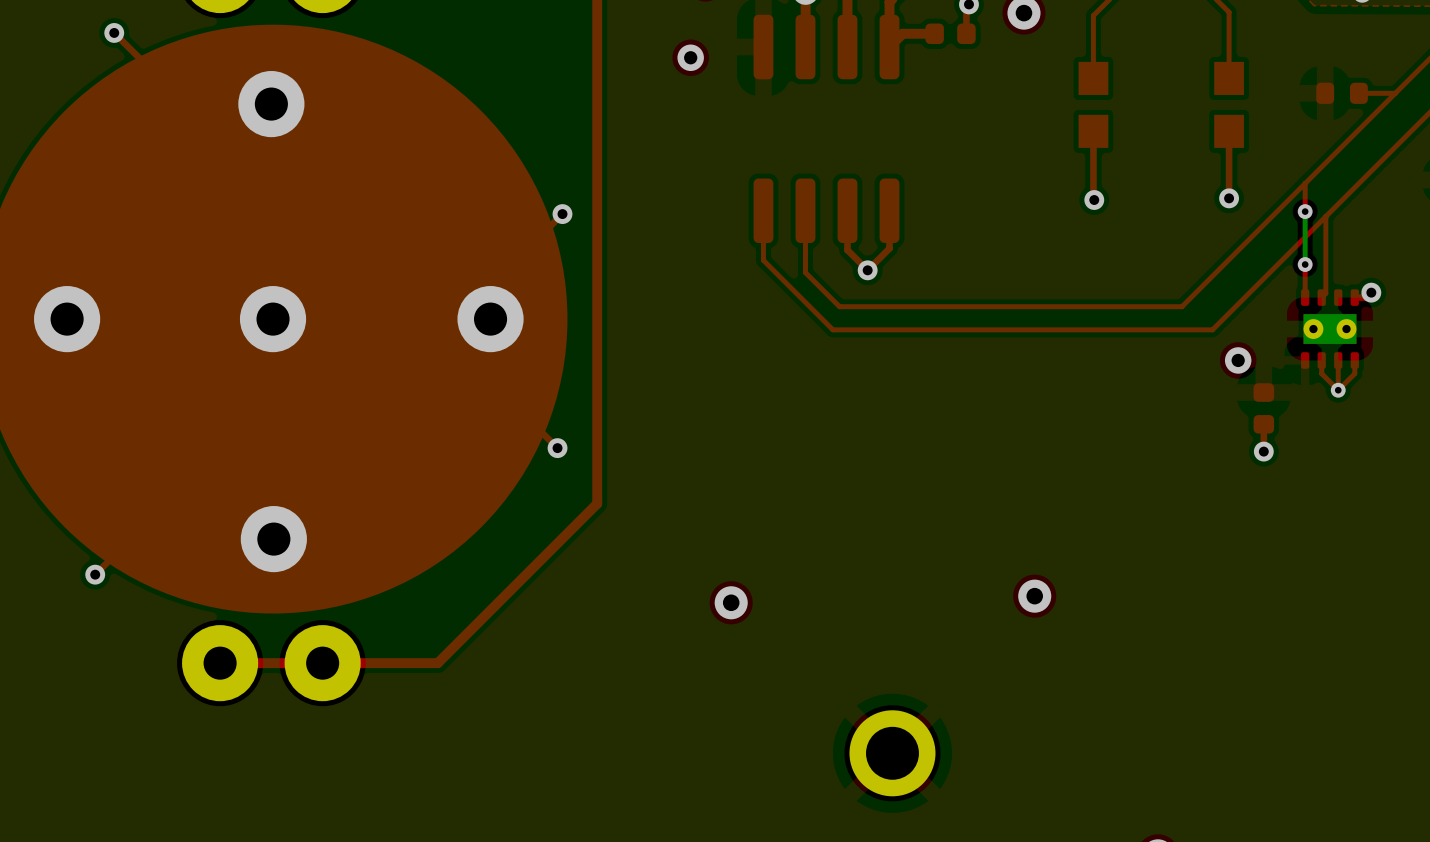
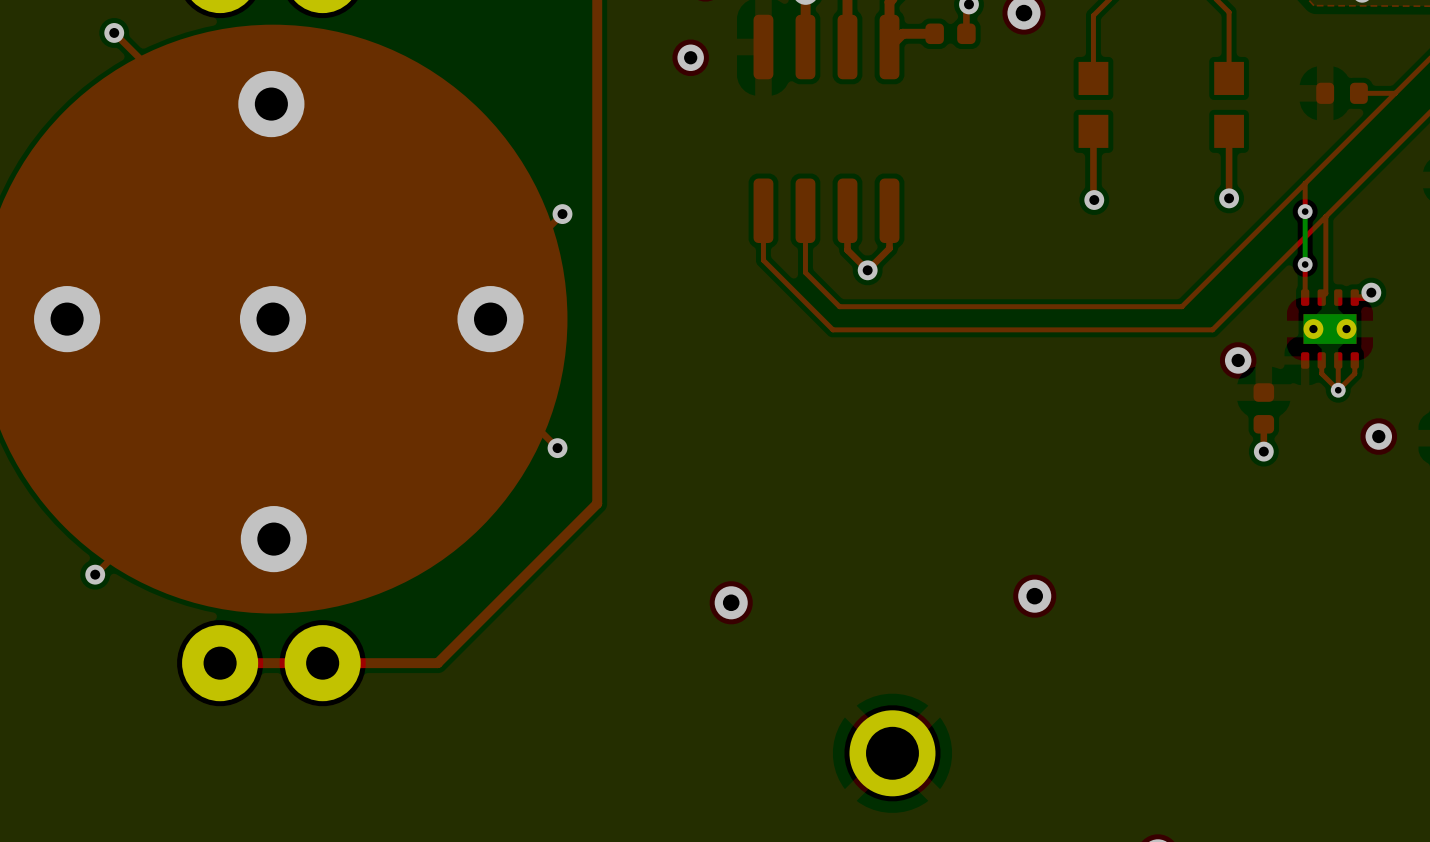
via: none -> (1378, 436)

